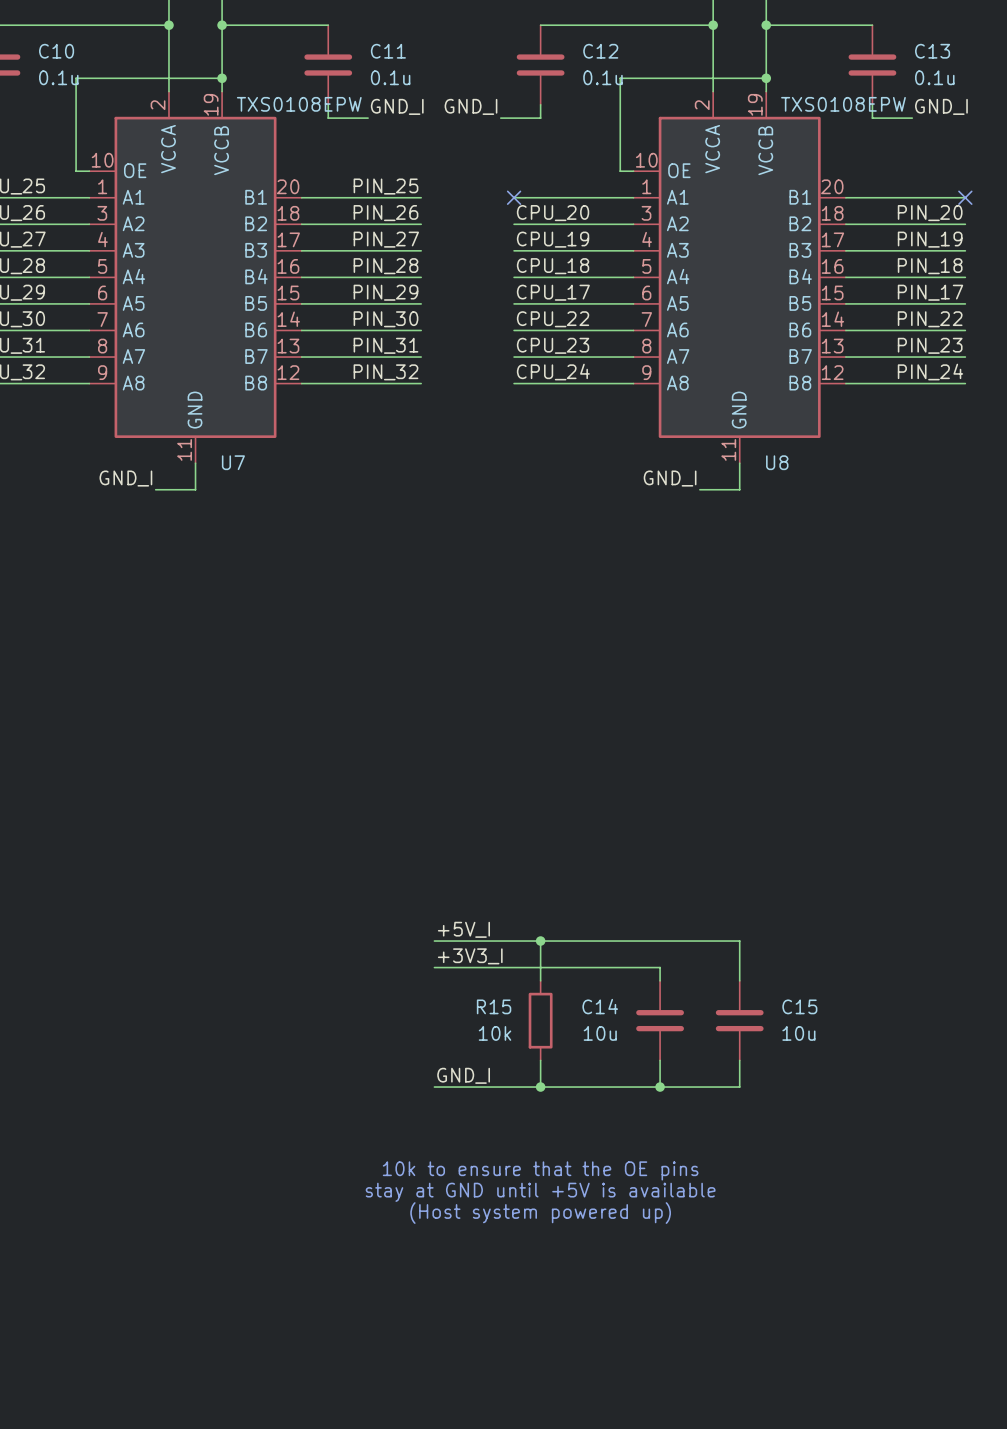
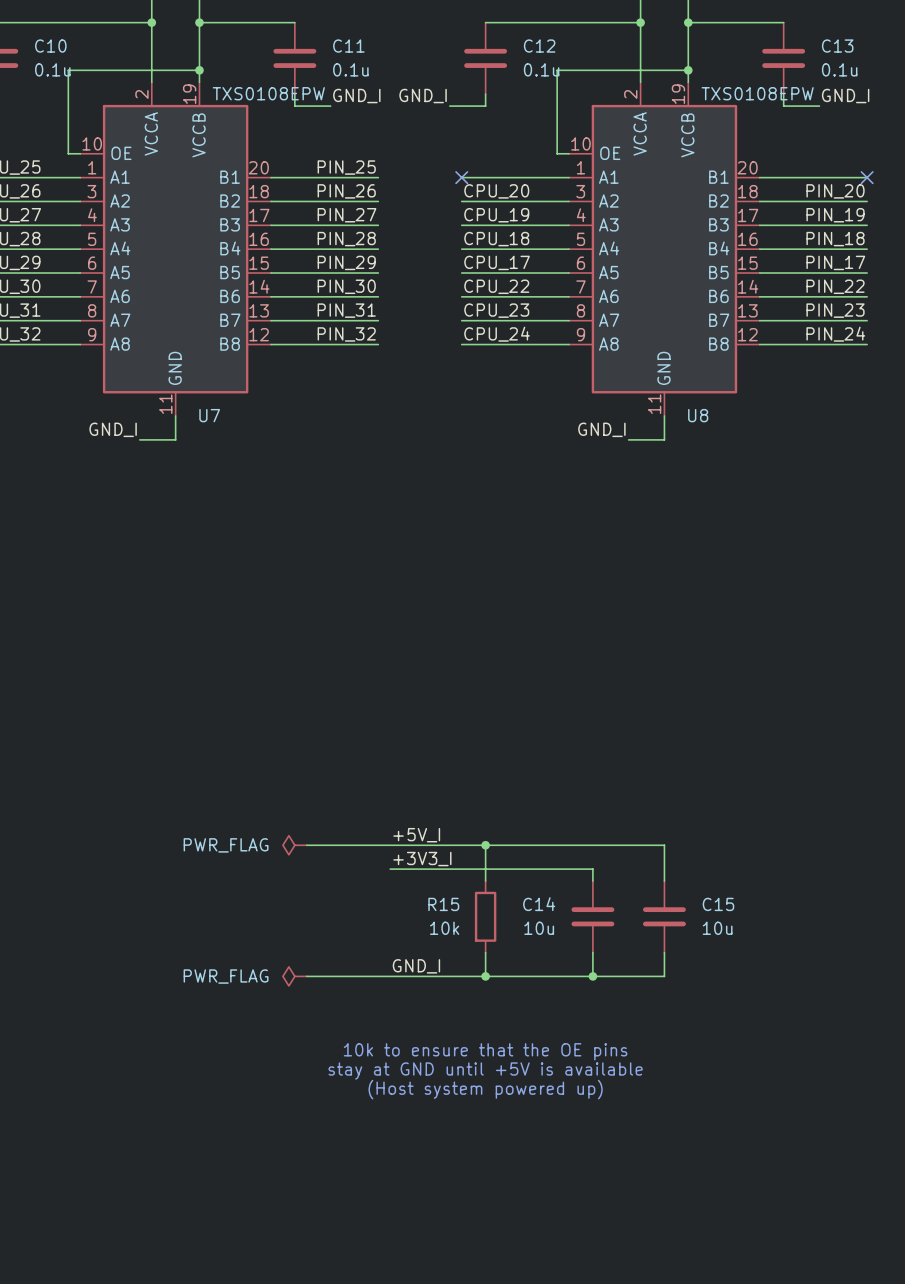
power symbol: none -> PWR_FLAG (294, 845)
wire: none -> (306, 845) (390, 845)
power symbol: none -> PWR_FLAG (294, 976)
wire: none -> (306, 976) (390, 976)

